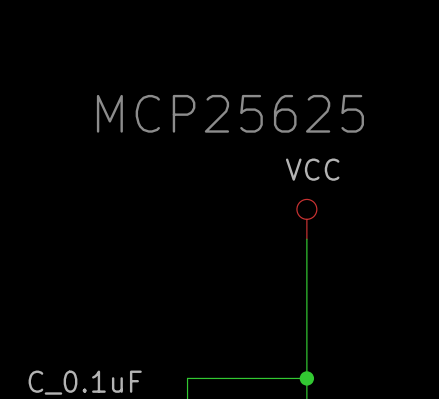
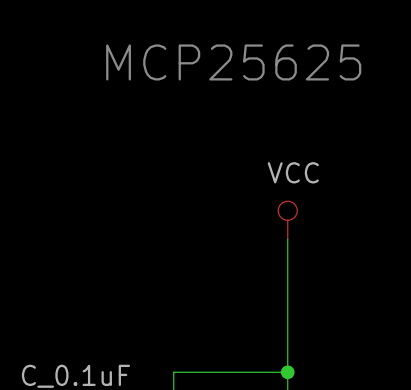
text position: MCP25625 (230, 113) -> MCP25625 (233, 62)

